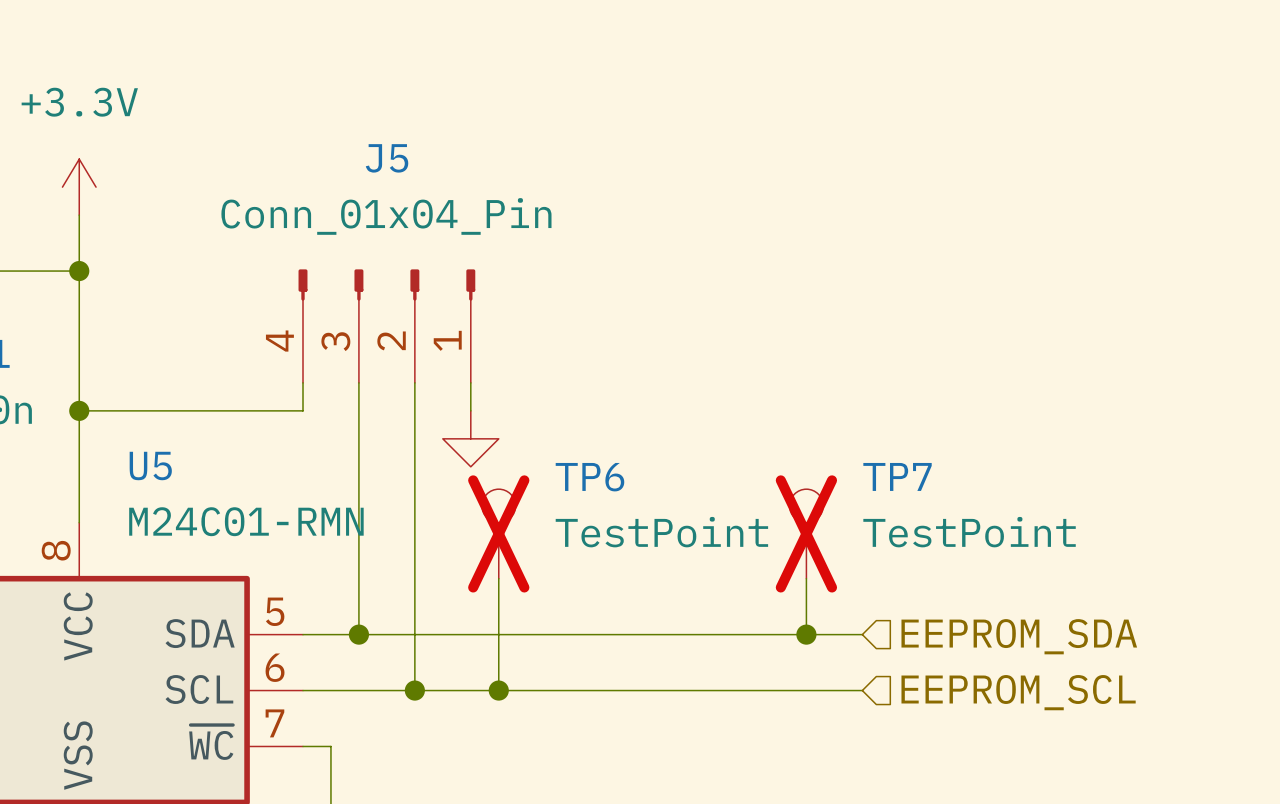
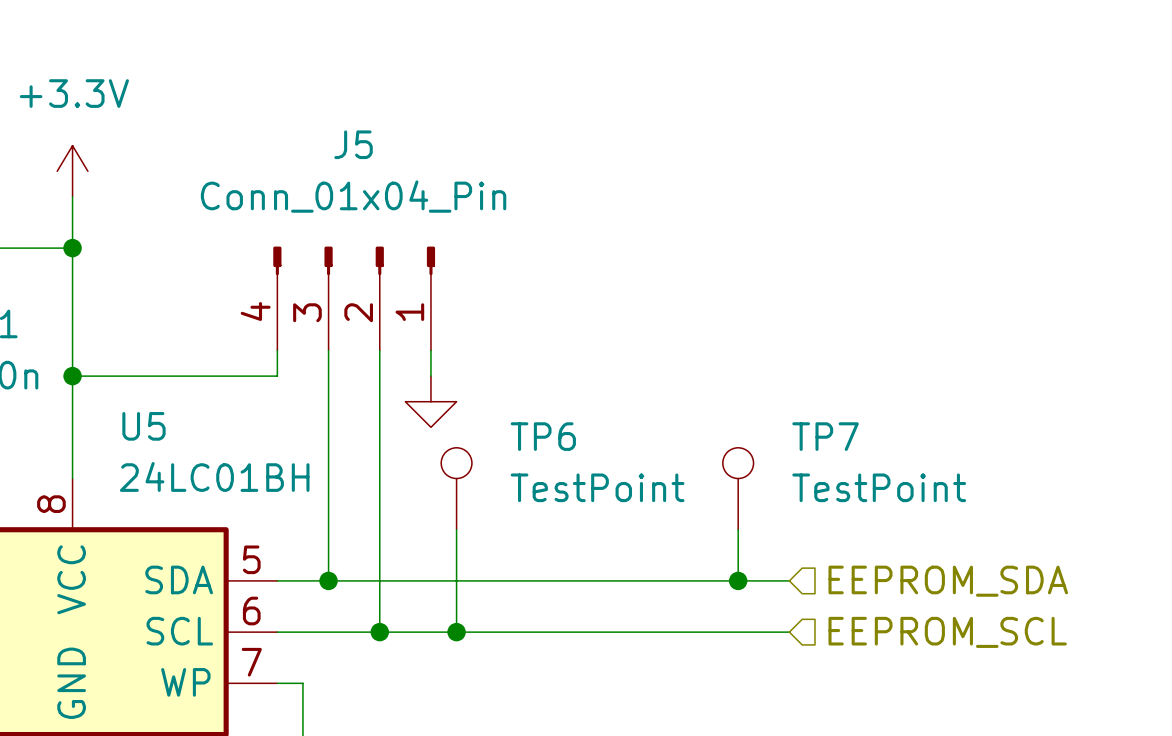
U5 value: M24C01-RMN (246, 521) -> 24LC01BH (214, 476)
TP6 do-not-place cross: (498, 533) -> none
TP7 do-not-place cross: (806, 533) -> none
U5 pin name: ~{WC} (211, 742) -> WP (185, 682)
U5 pin name: VSS (78, 755) -> GND (71, 683)

